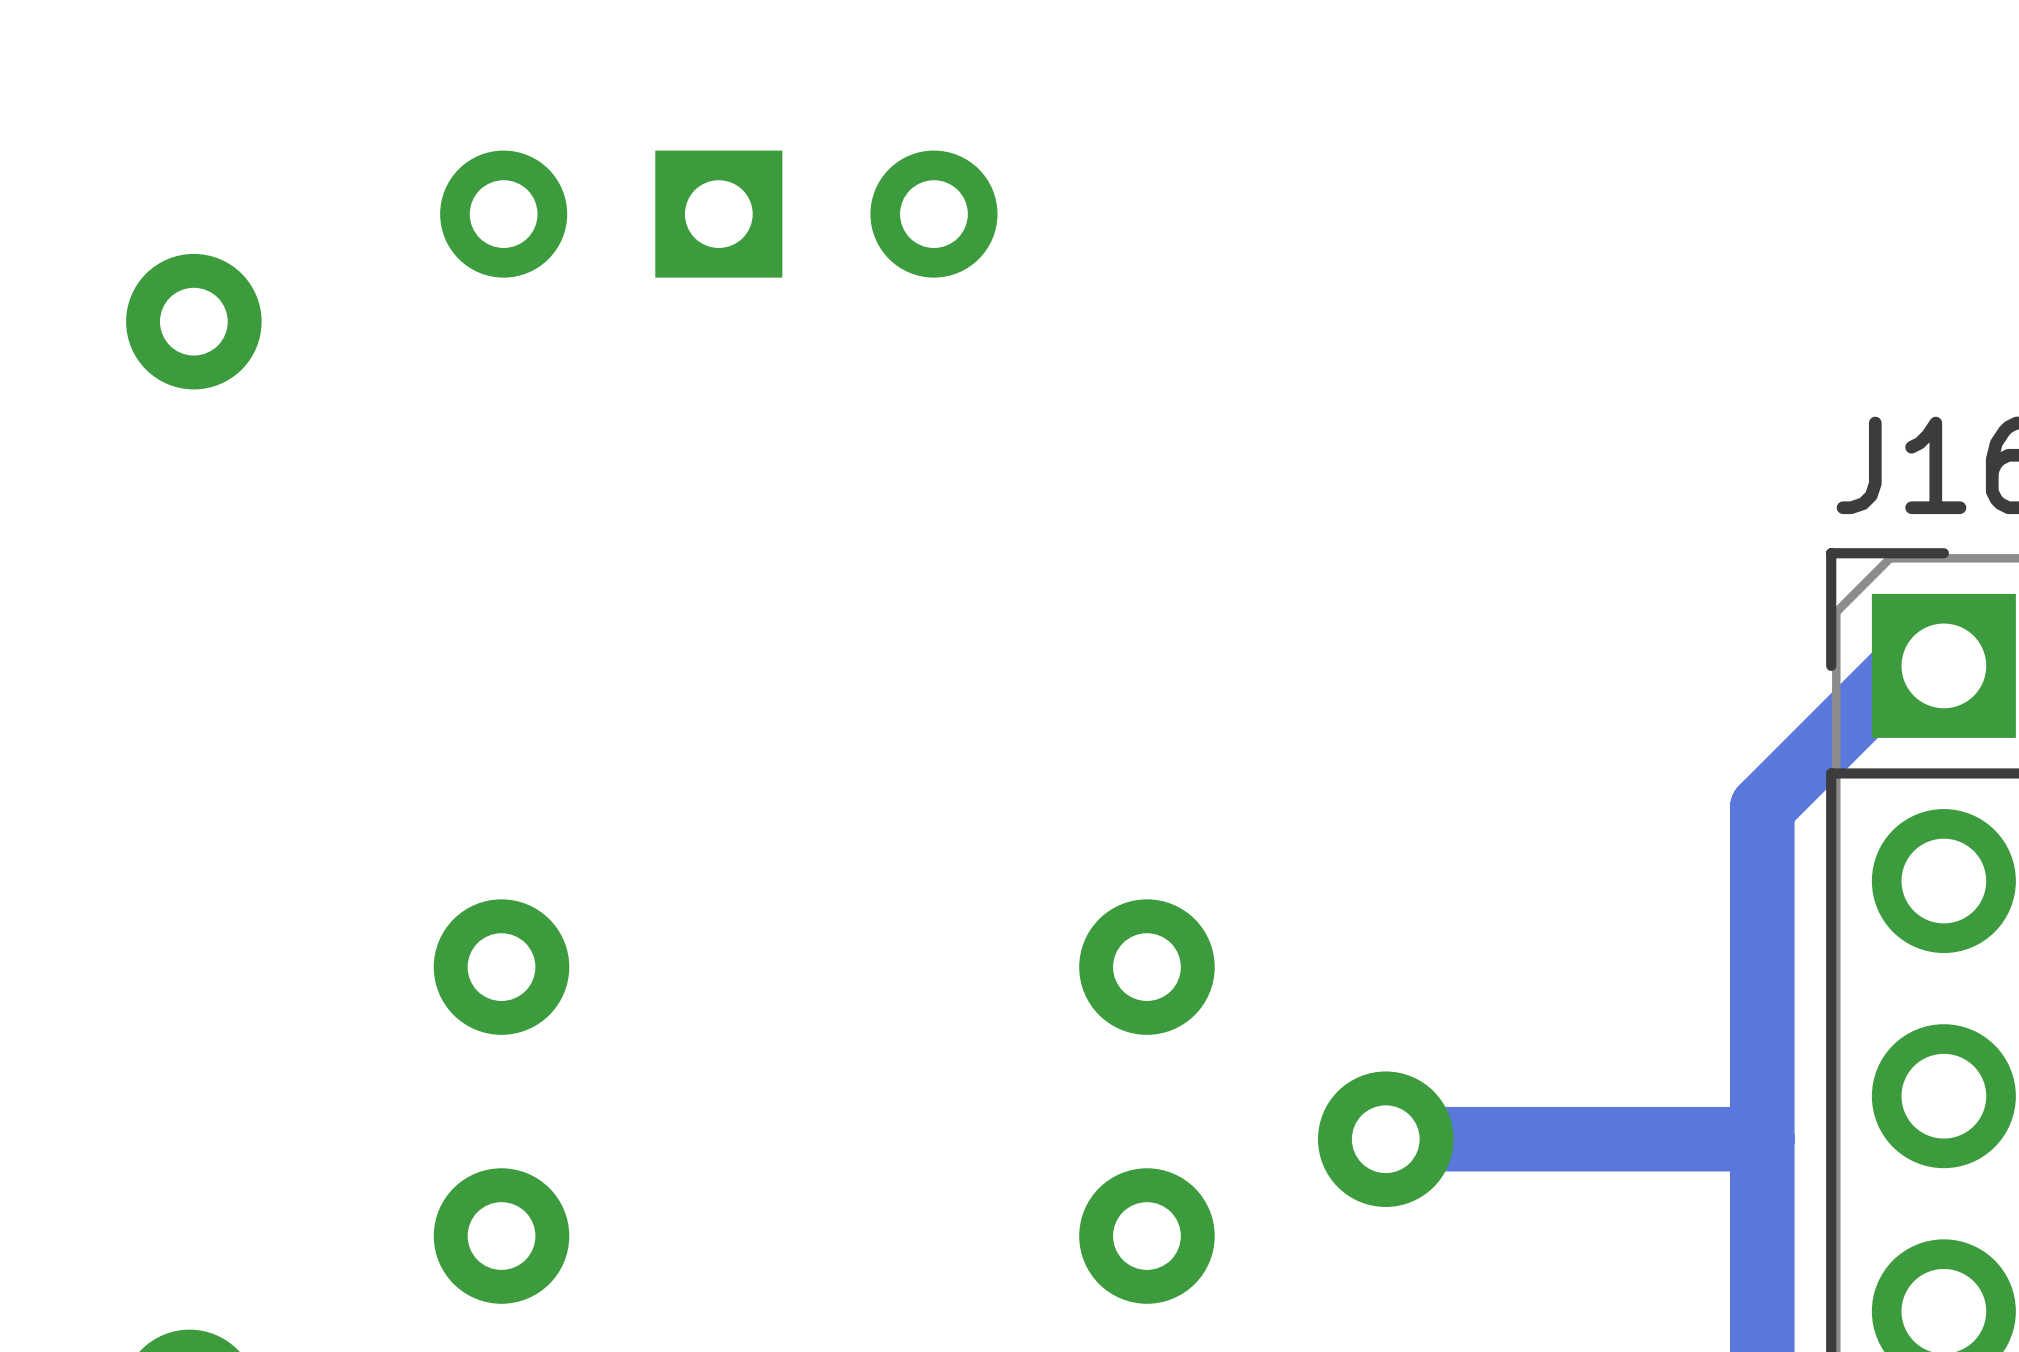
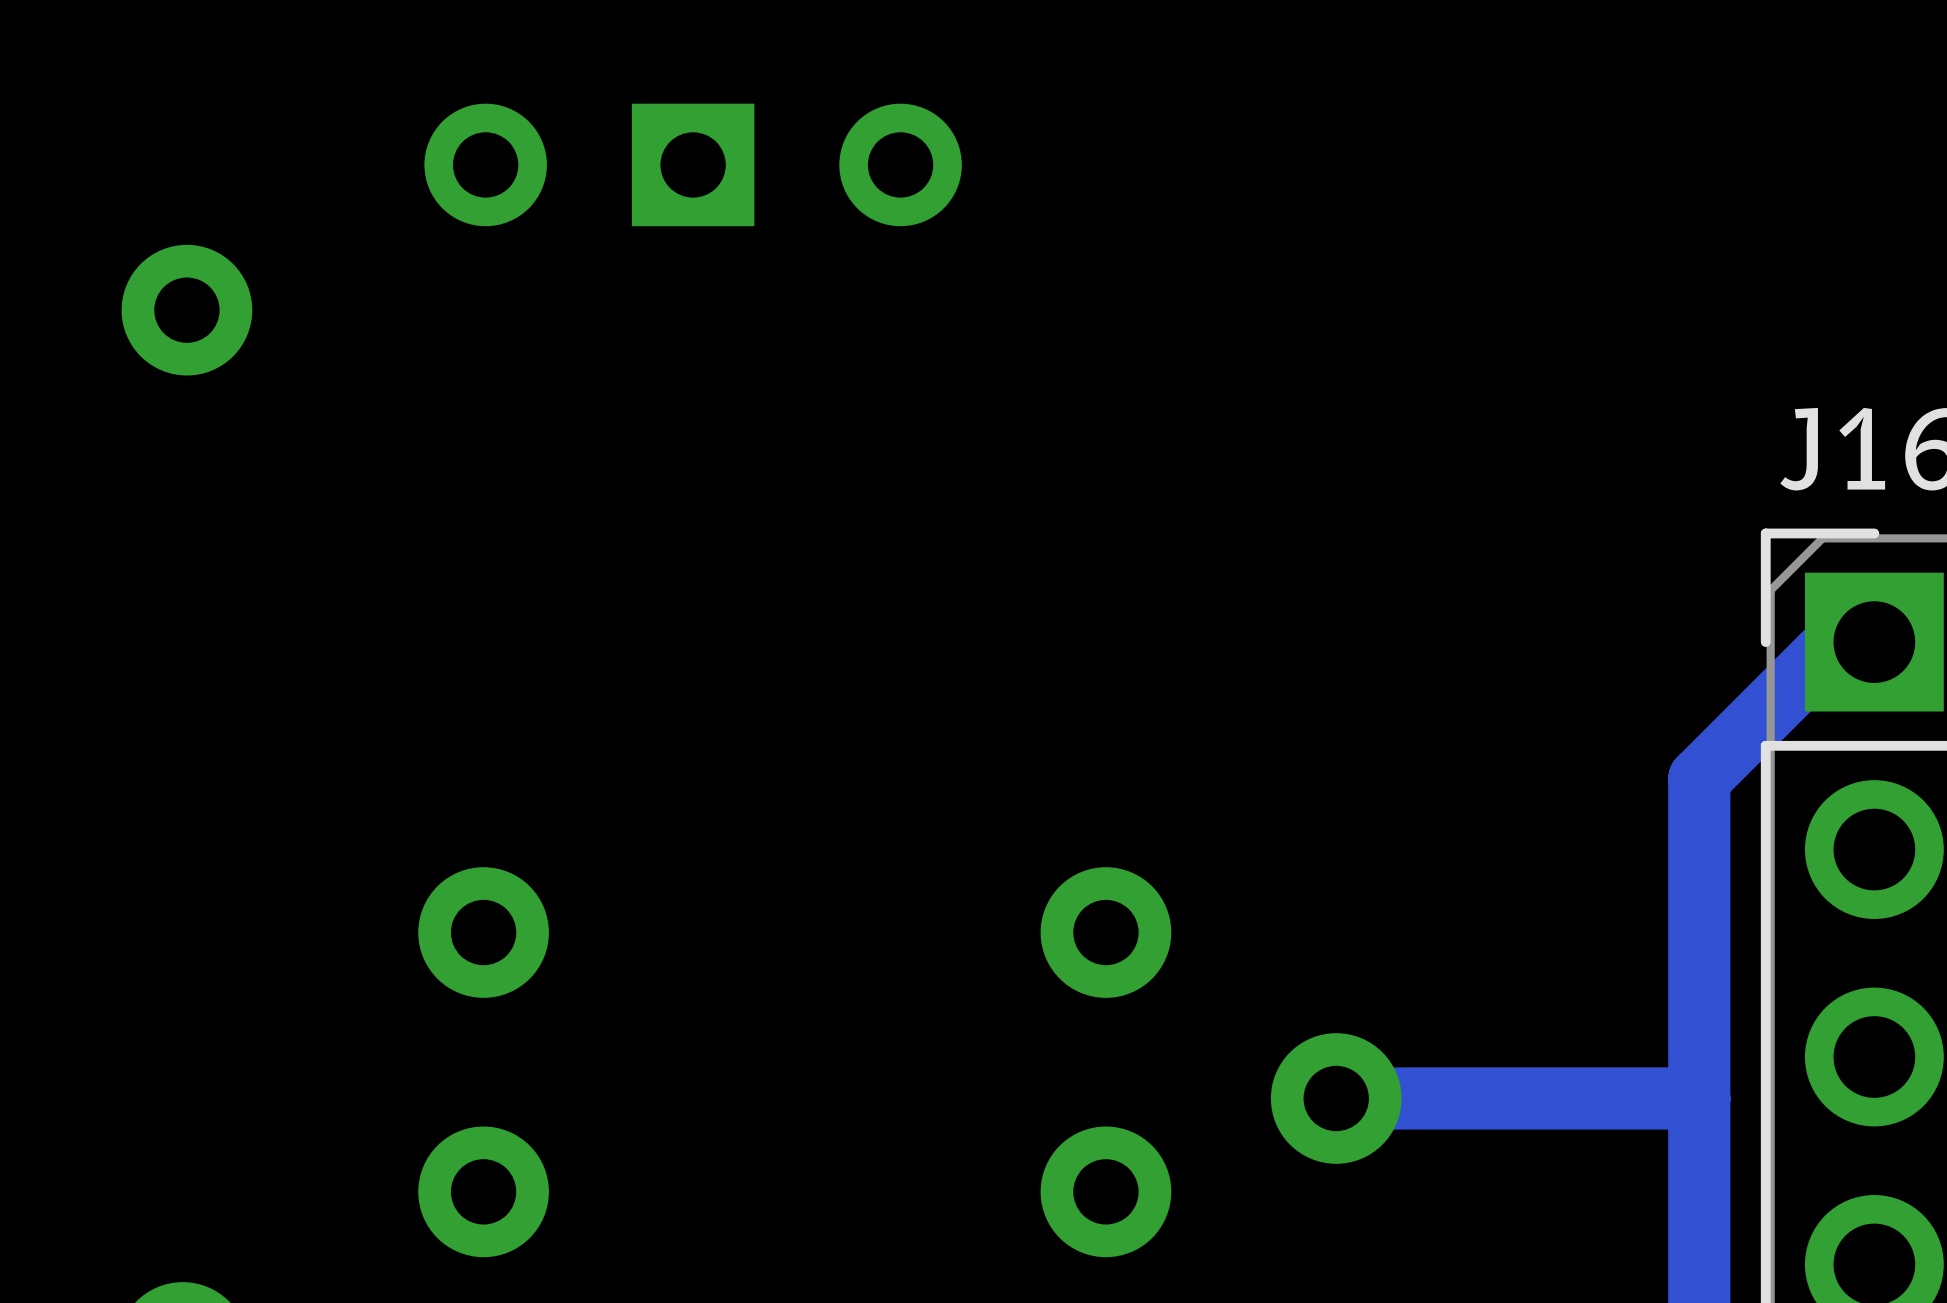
part position: (718, 214) -> (693, 164)

